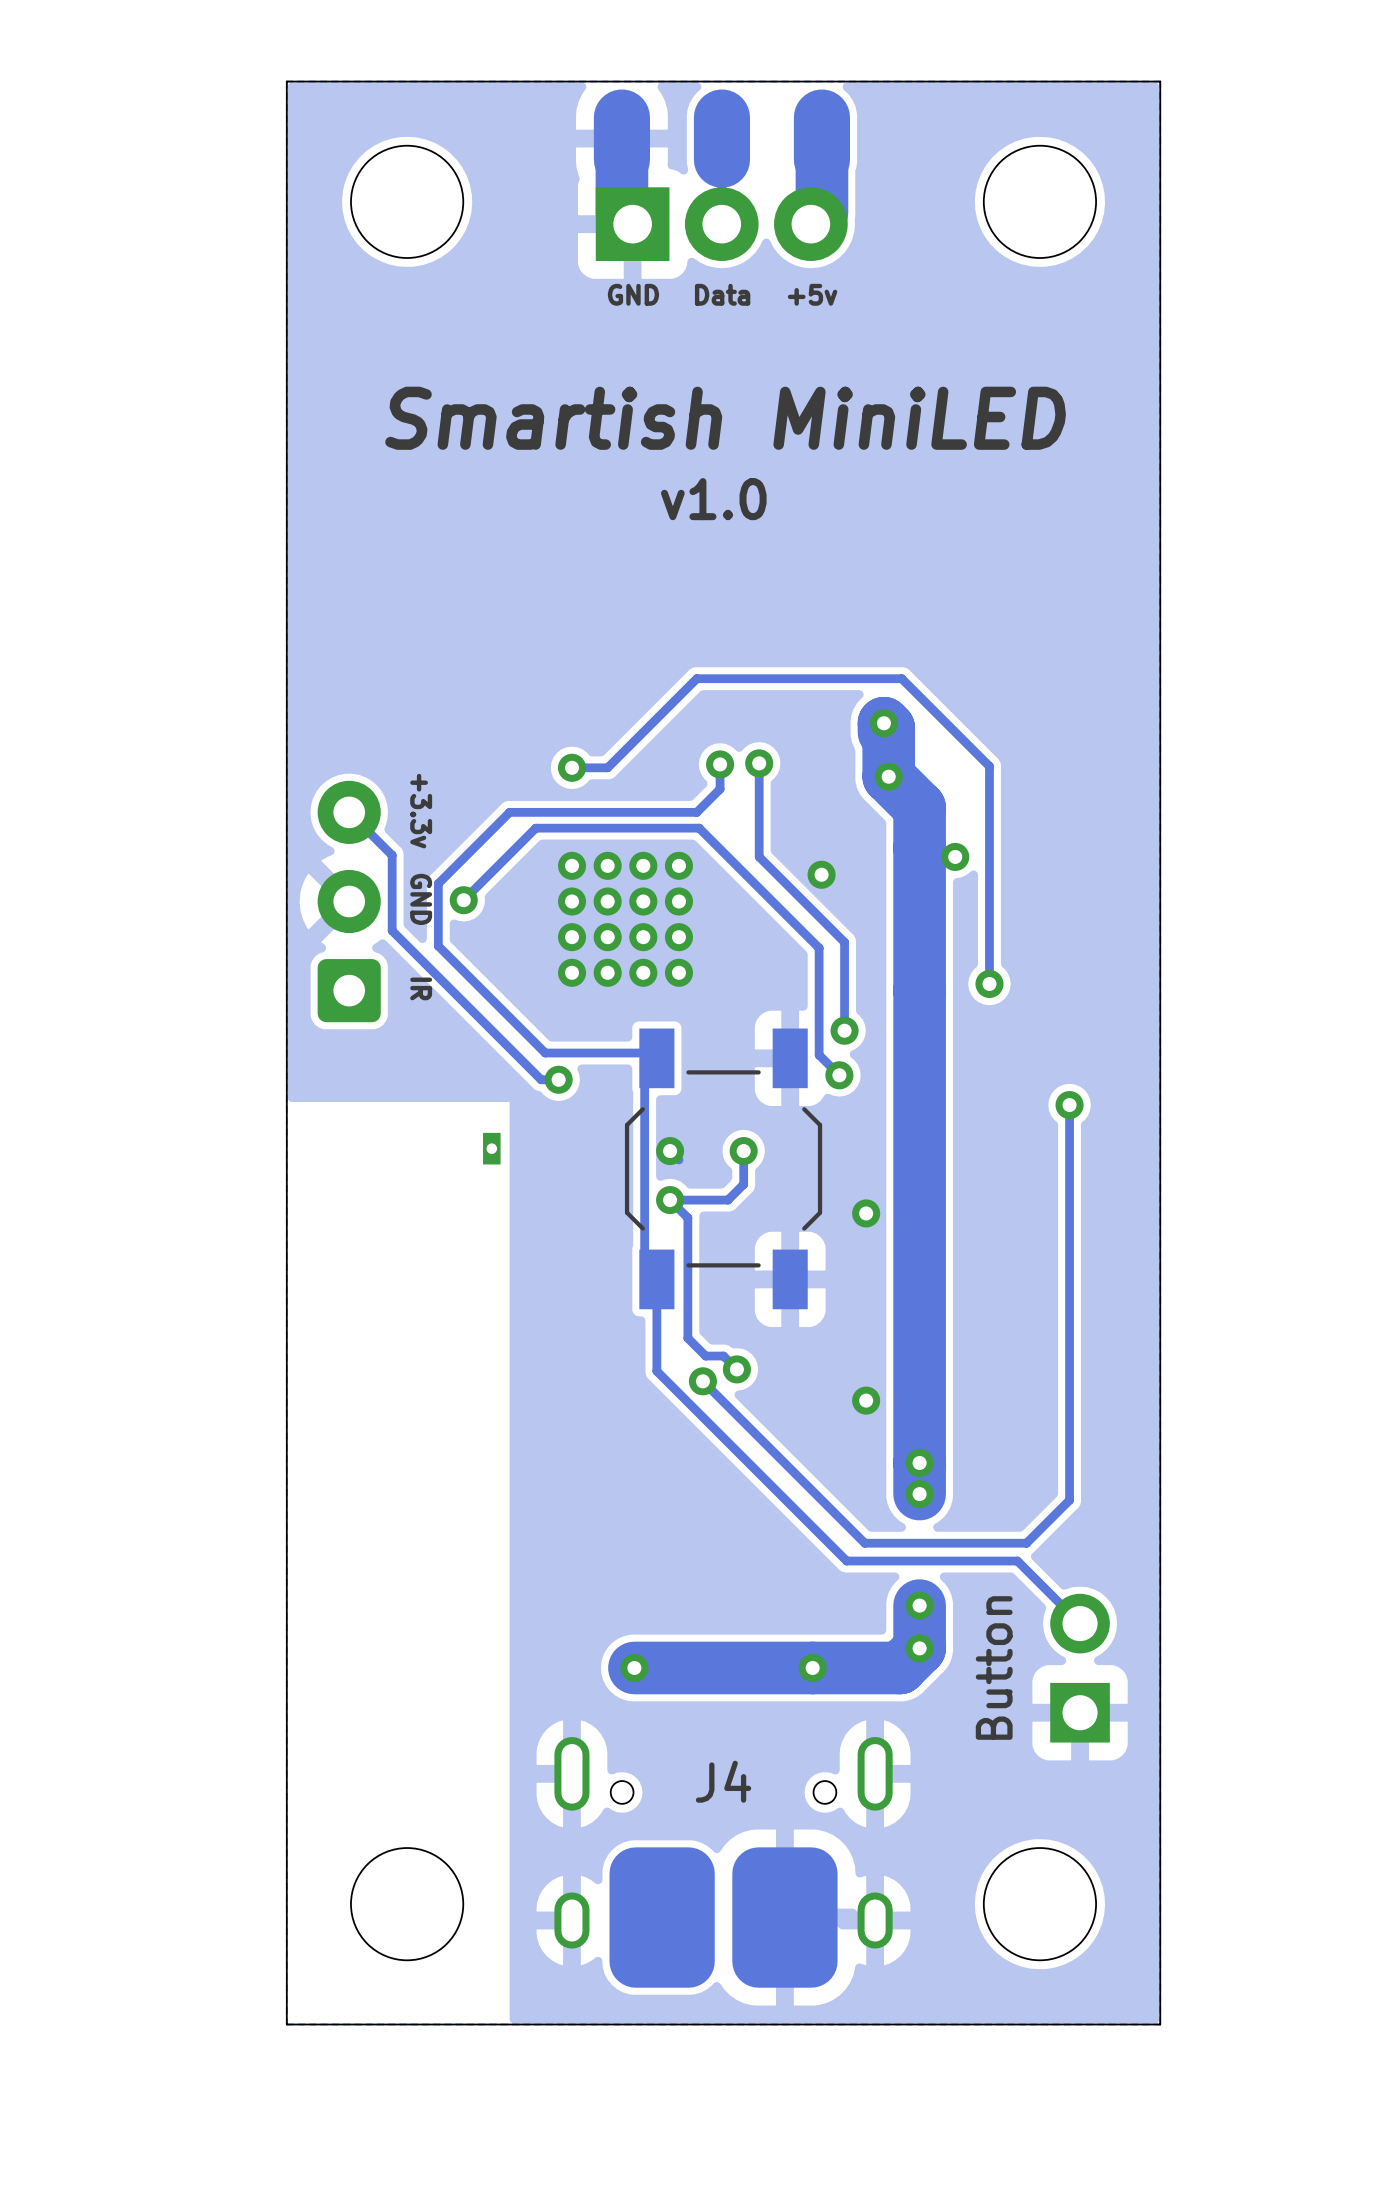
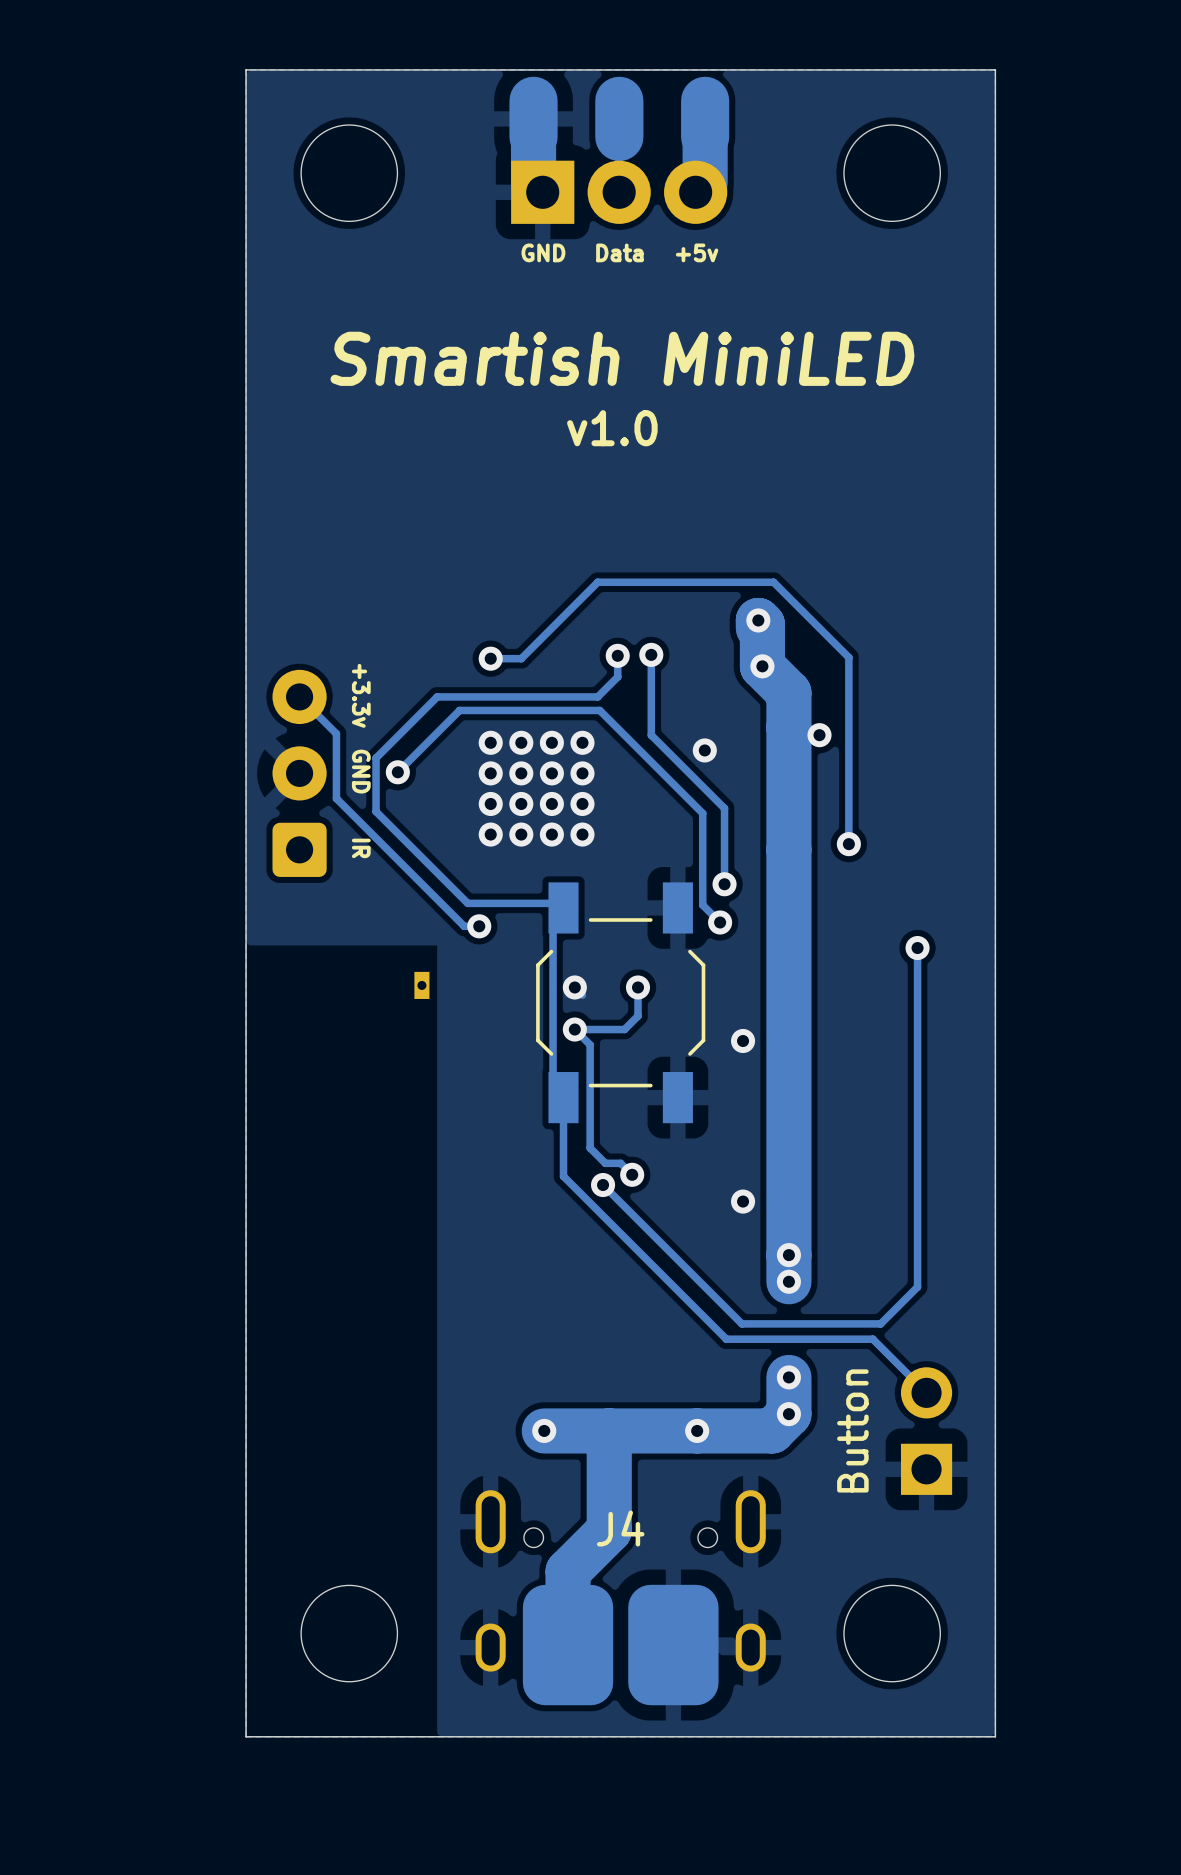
track: none -> (609, 1430) (609, 1530) (568, 1571) (568, 1645)

